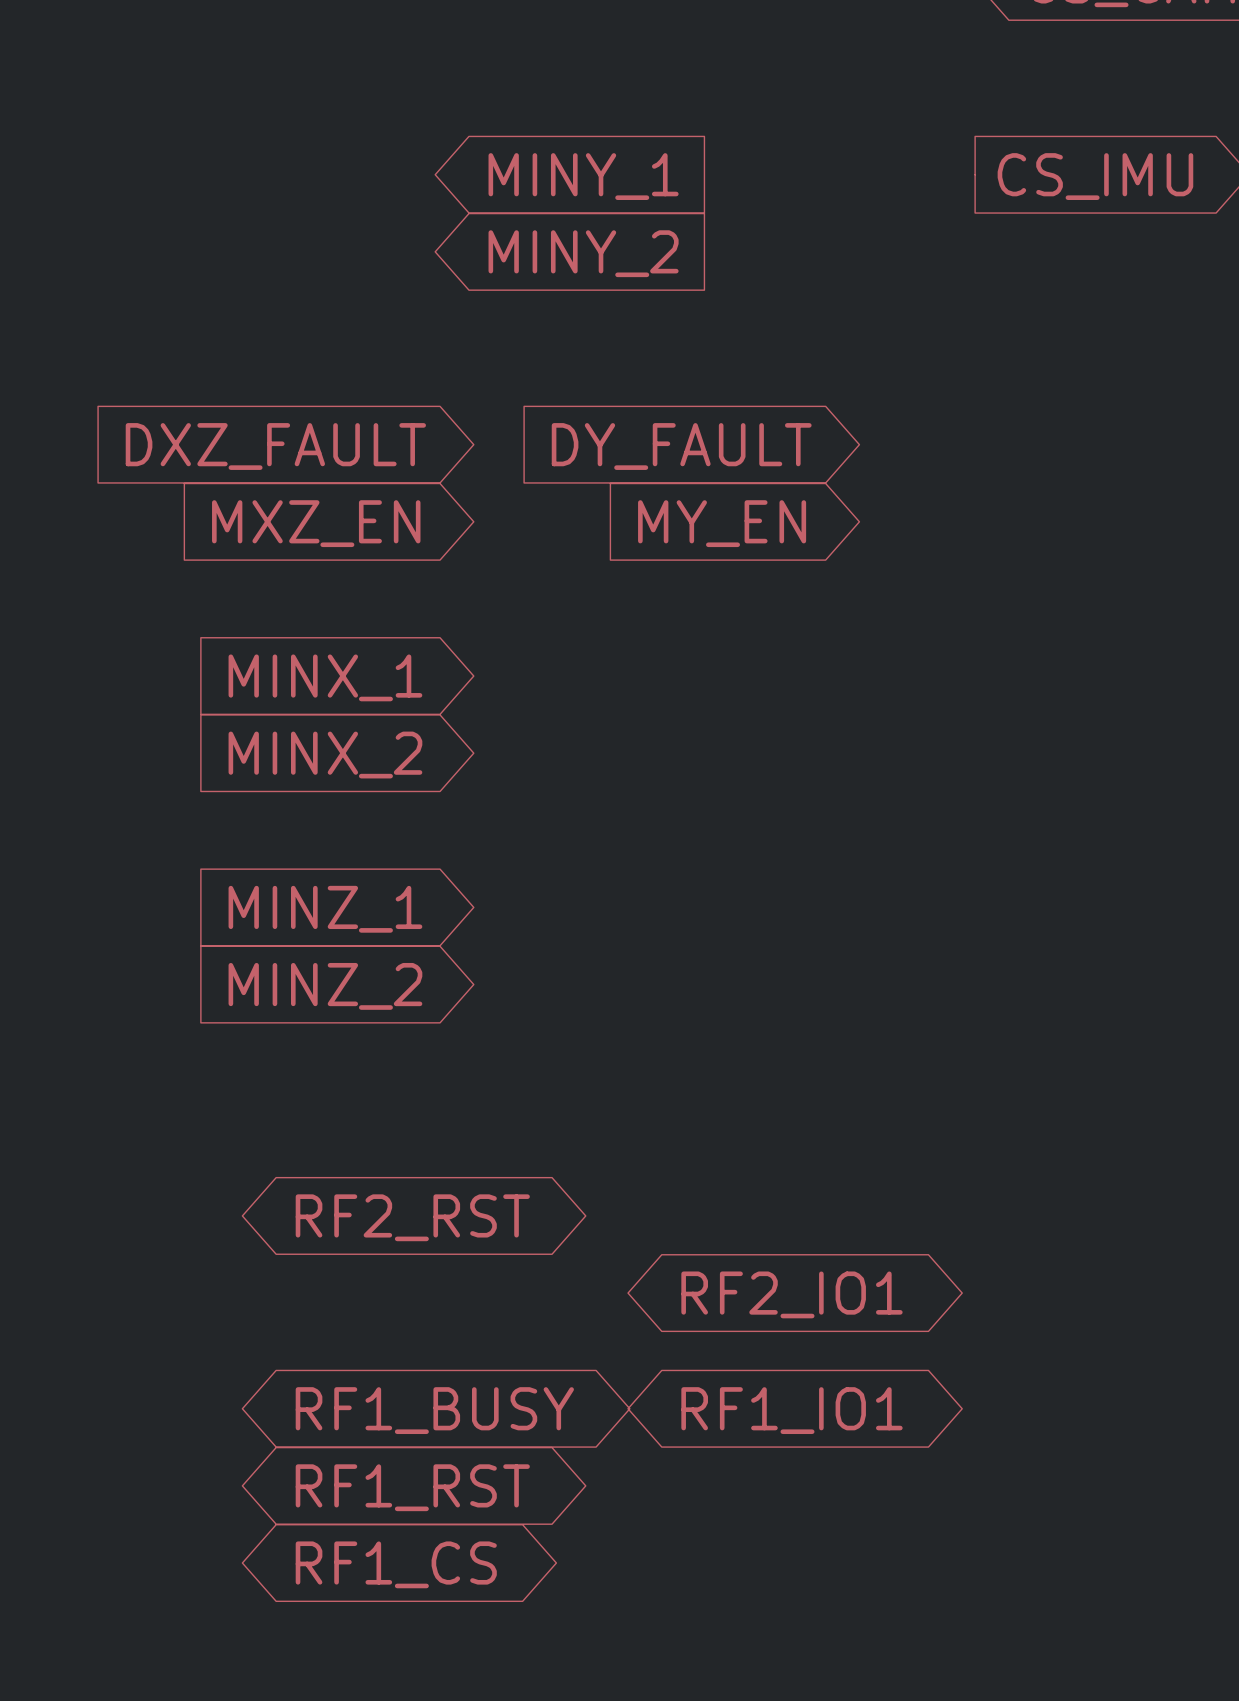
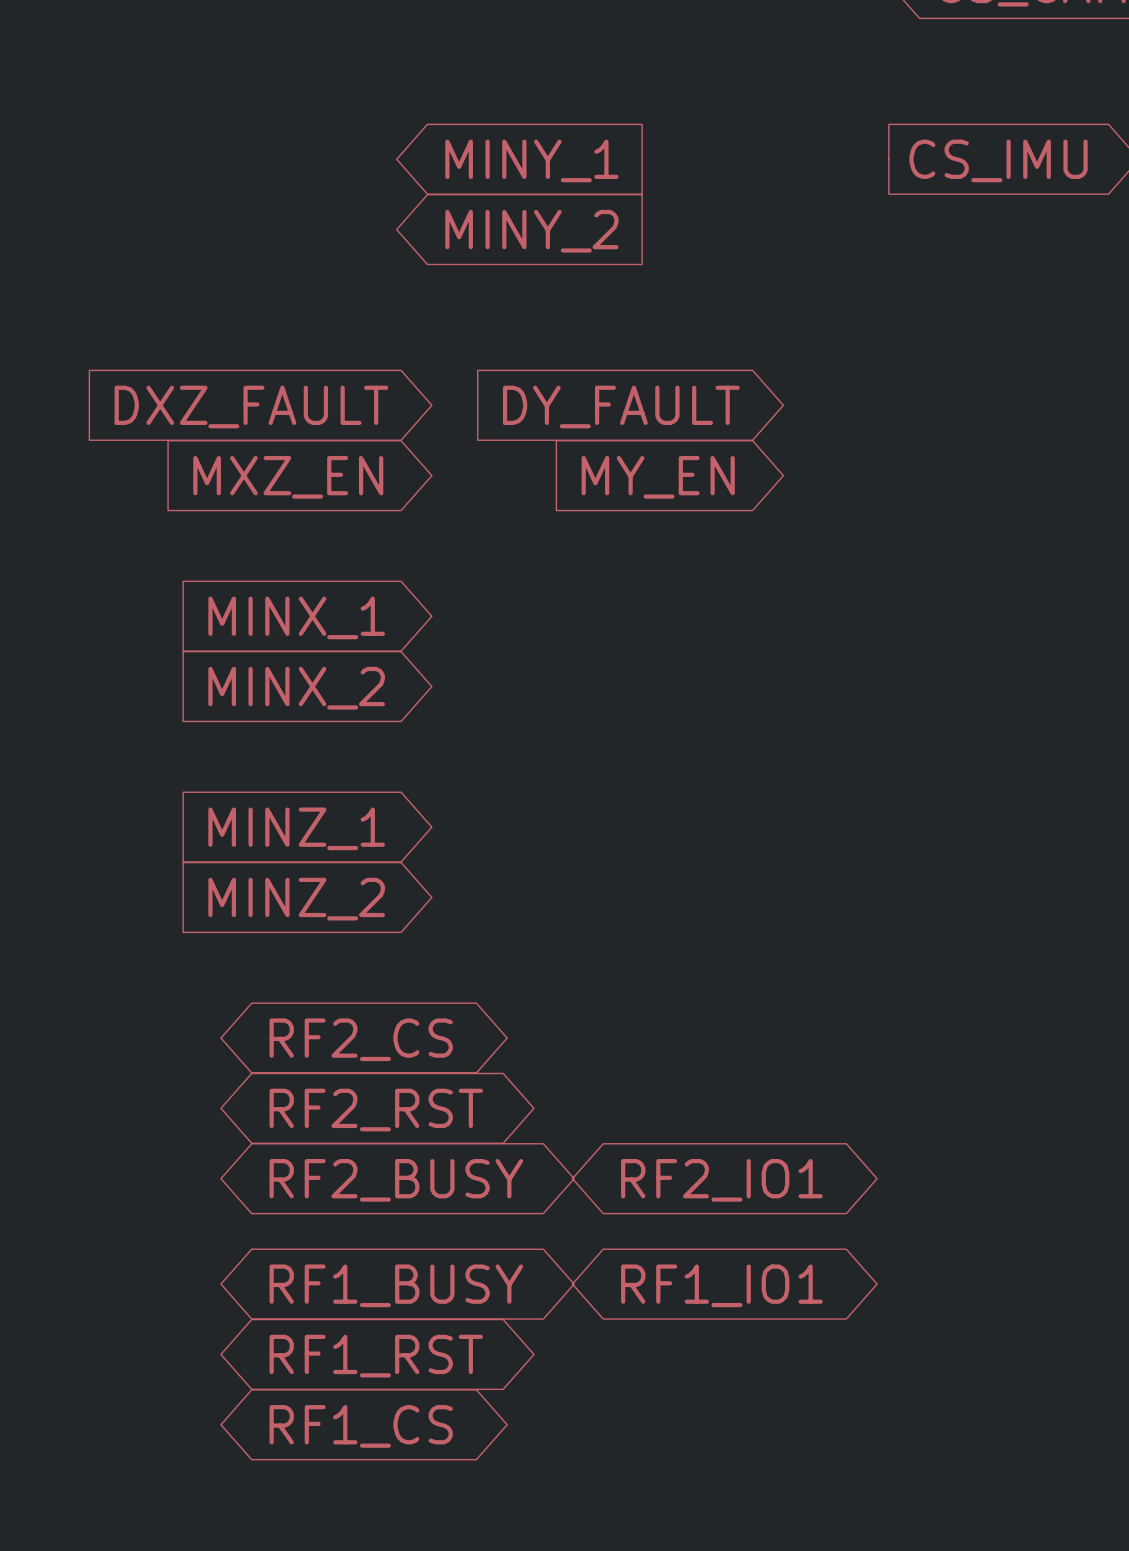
global label: none -> RF2_CS (361, 1039)
global label: none -> RF2_BUSY (396, 1180)

